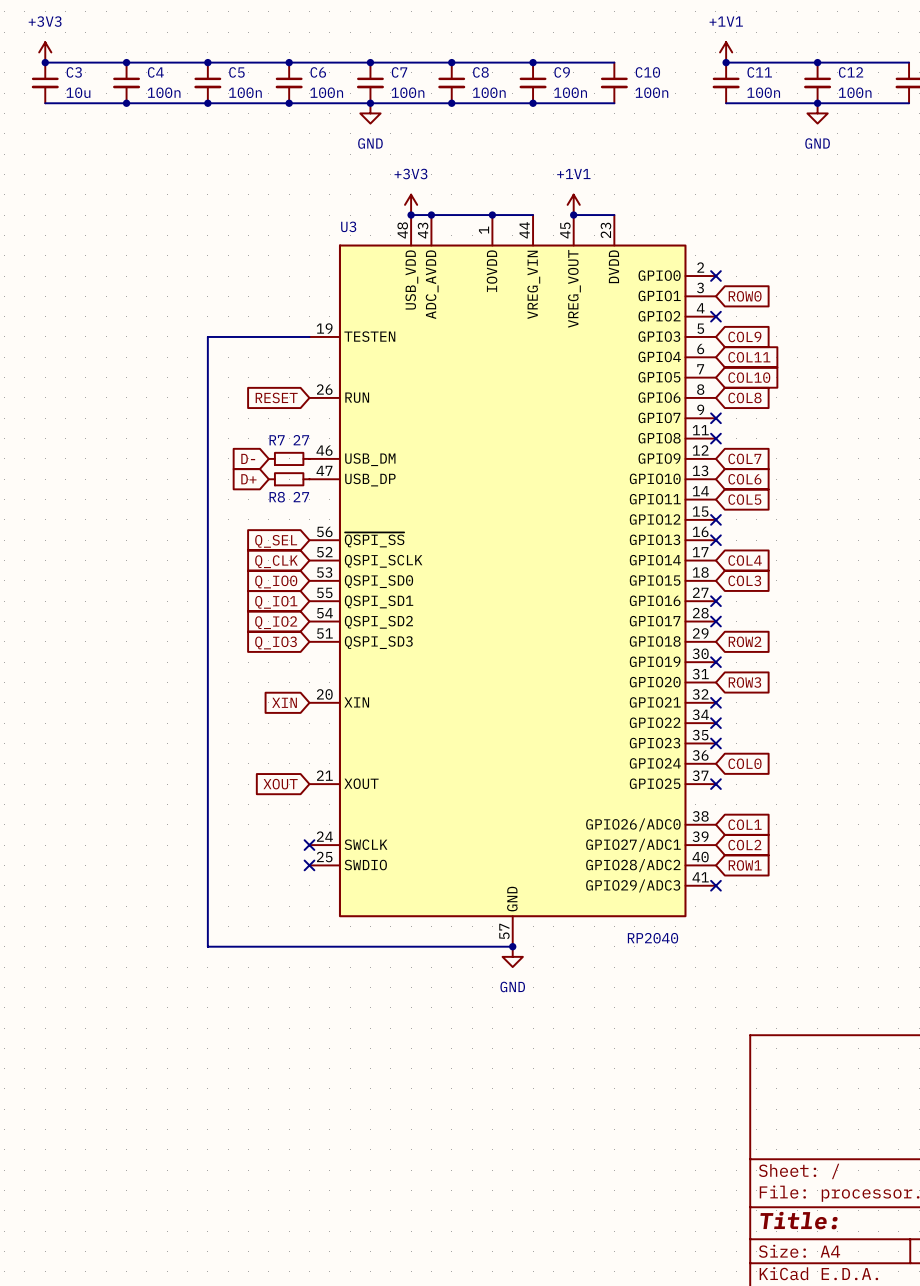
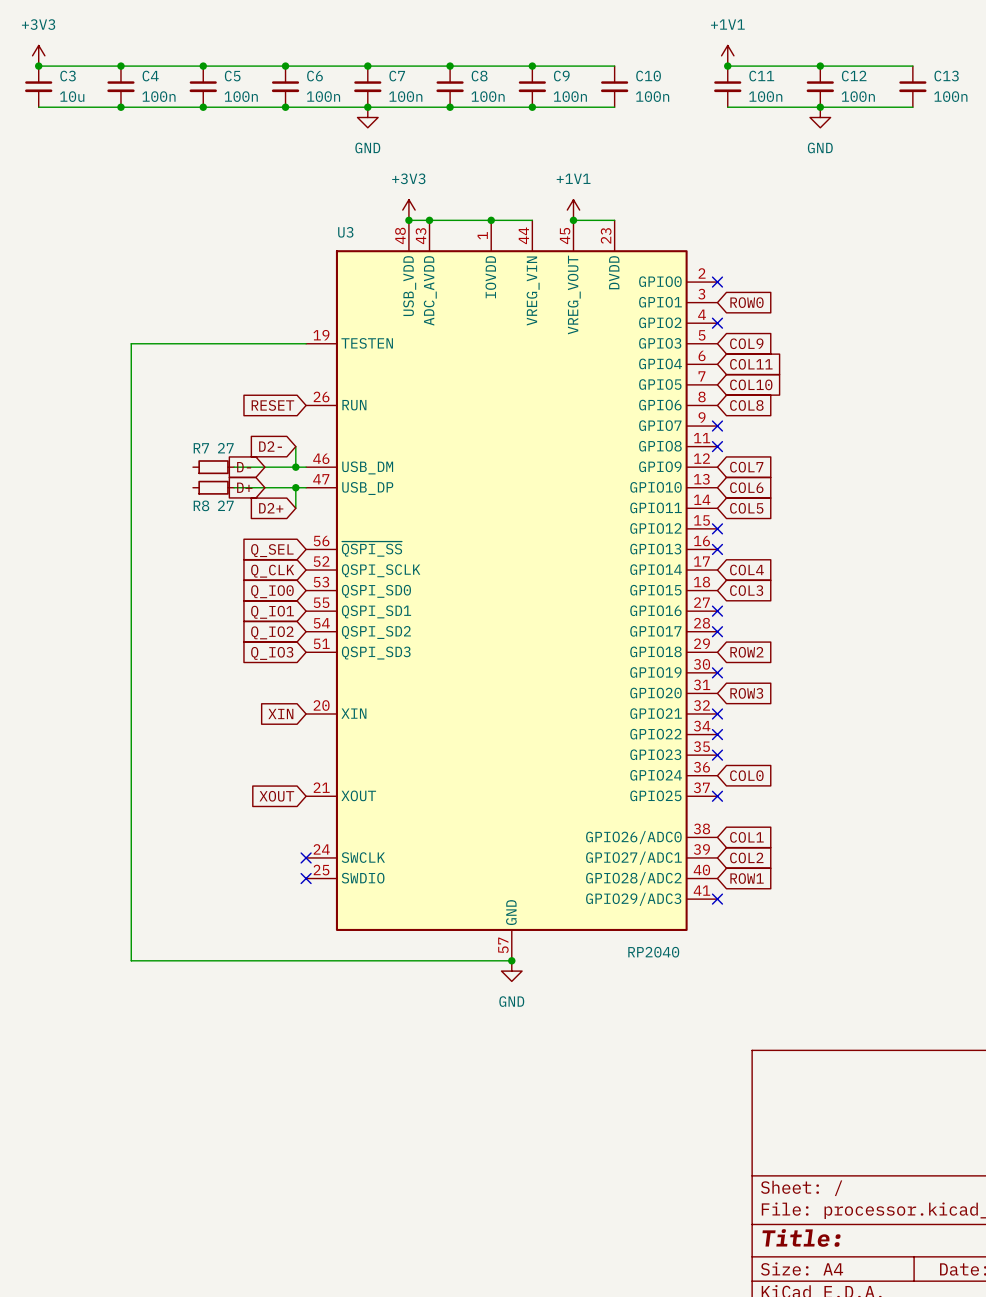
wire: (207, 336) (207, 946) -> (203, 343) (131, 343) (131, 960) (203, 960)
global label: none -> D2- (270, 446)
wire: none -> (295, 446) (295, 467)
wire: none -> (234, 467) (306, 467)
R7 position: (289, 458) -> (213, 467)
junction: none -> (295, 467)
wire: none -> (234, 487) (306, 487)
R8 position: (289, 479) -> (213, 487)
wire: none -> (295, 487) (295, 508)
junction: none -> (295, 487)
global label: none -> D2+ (271, 508)

